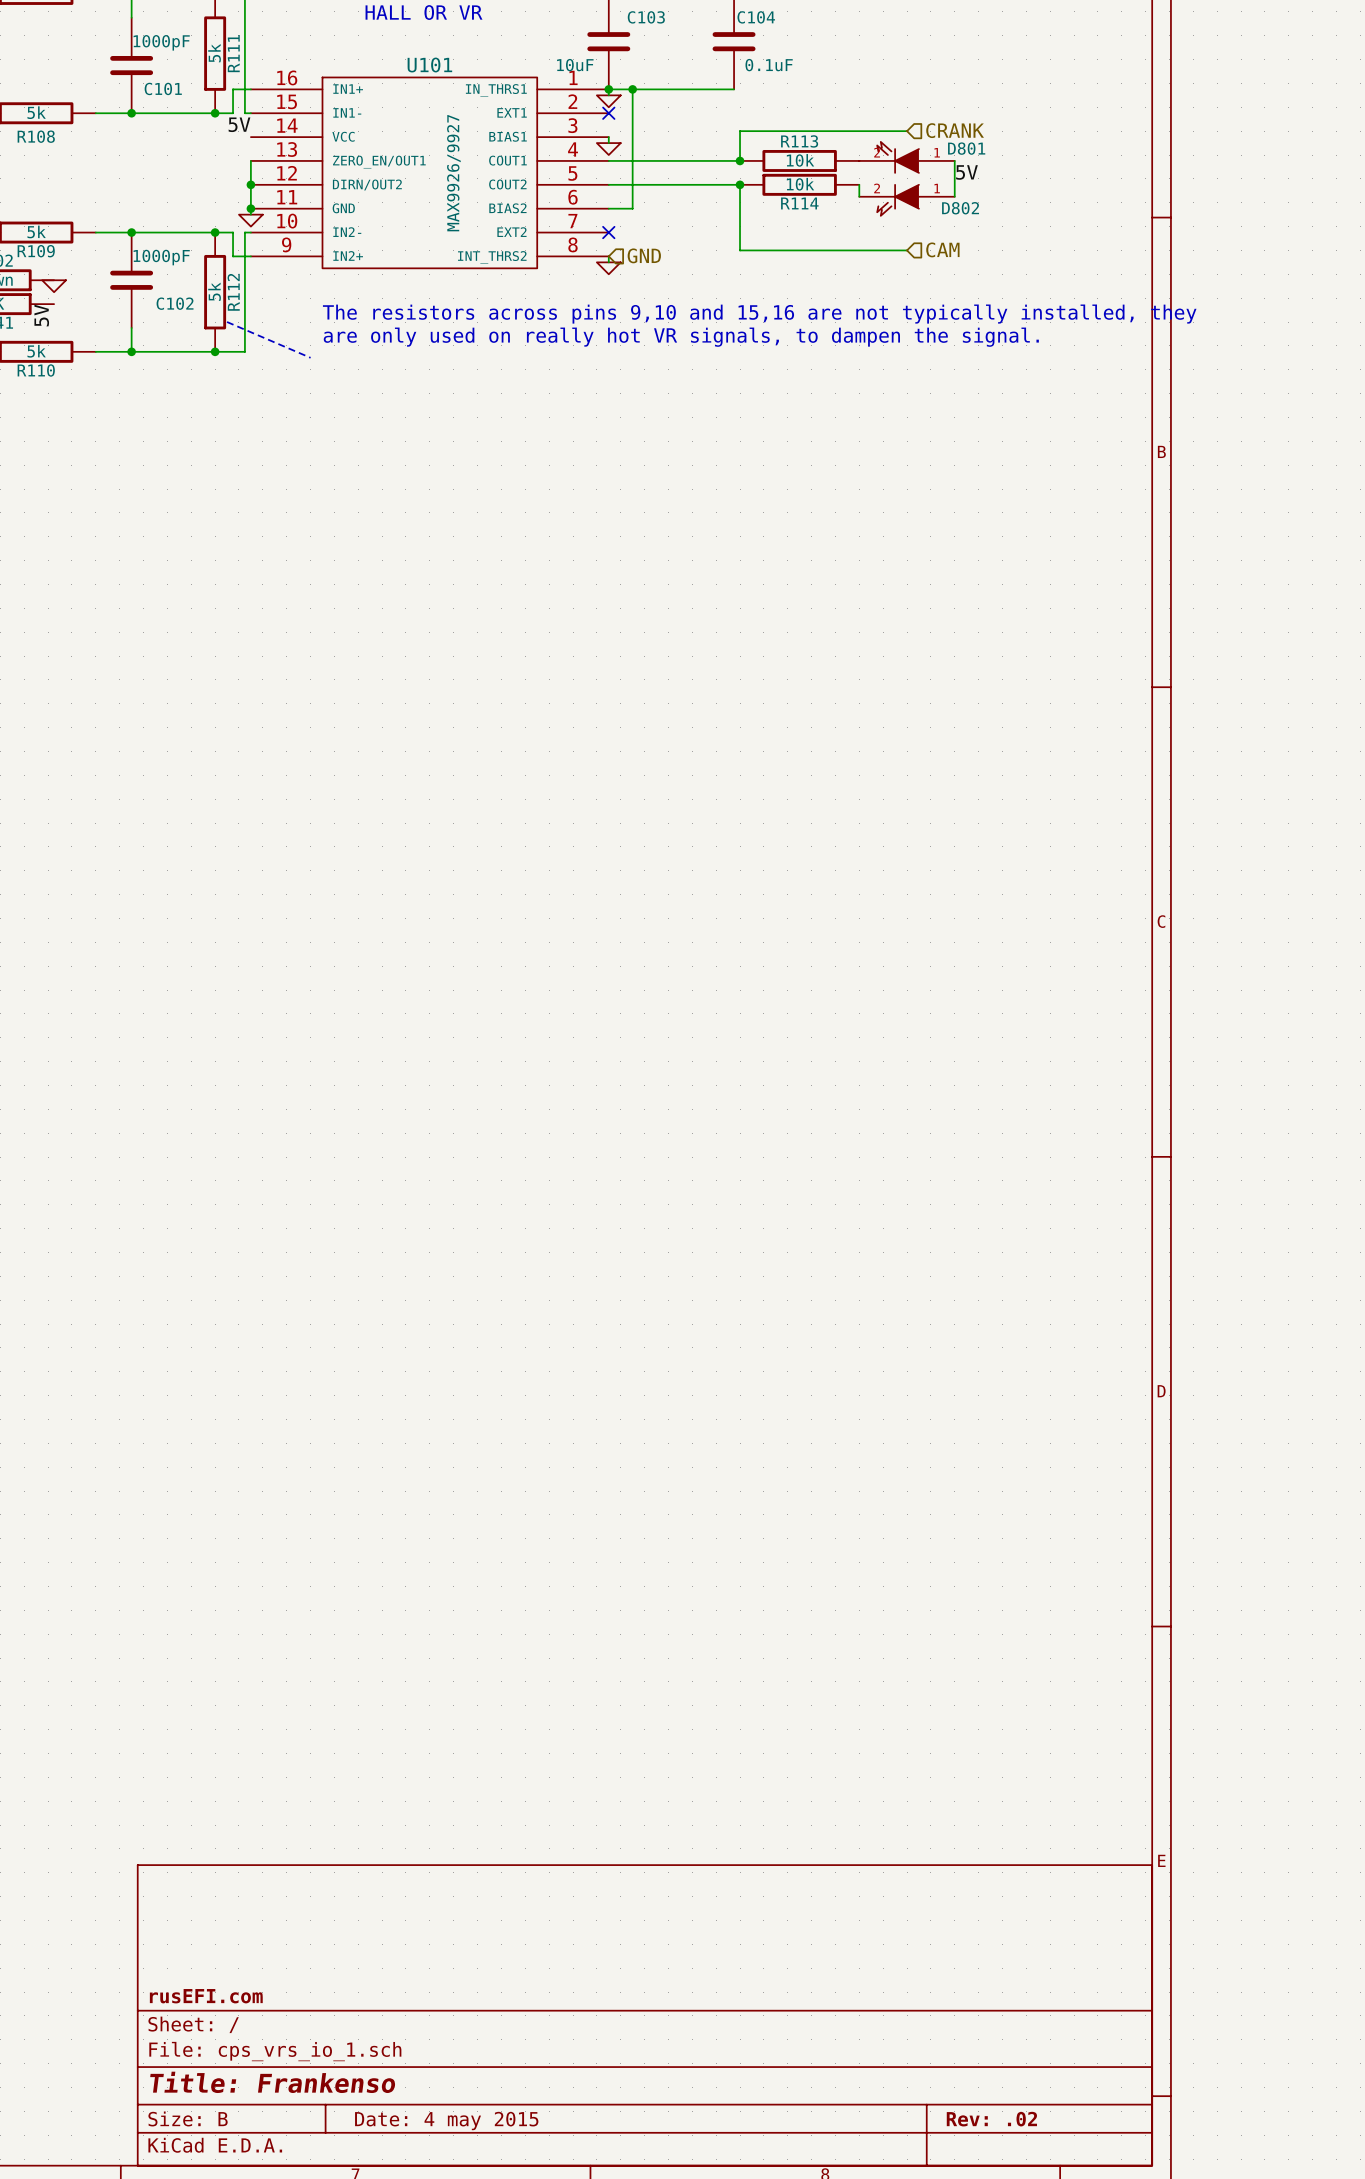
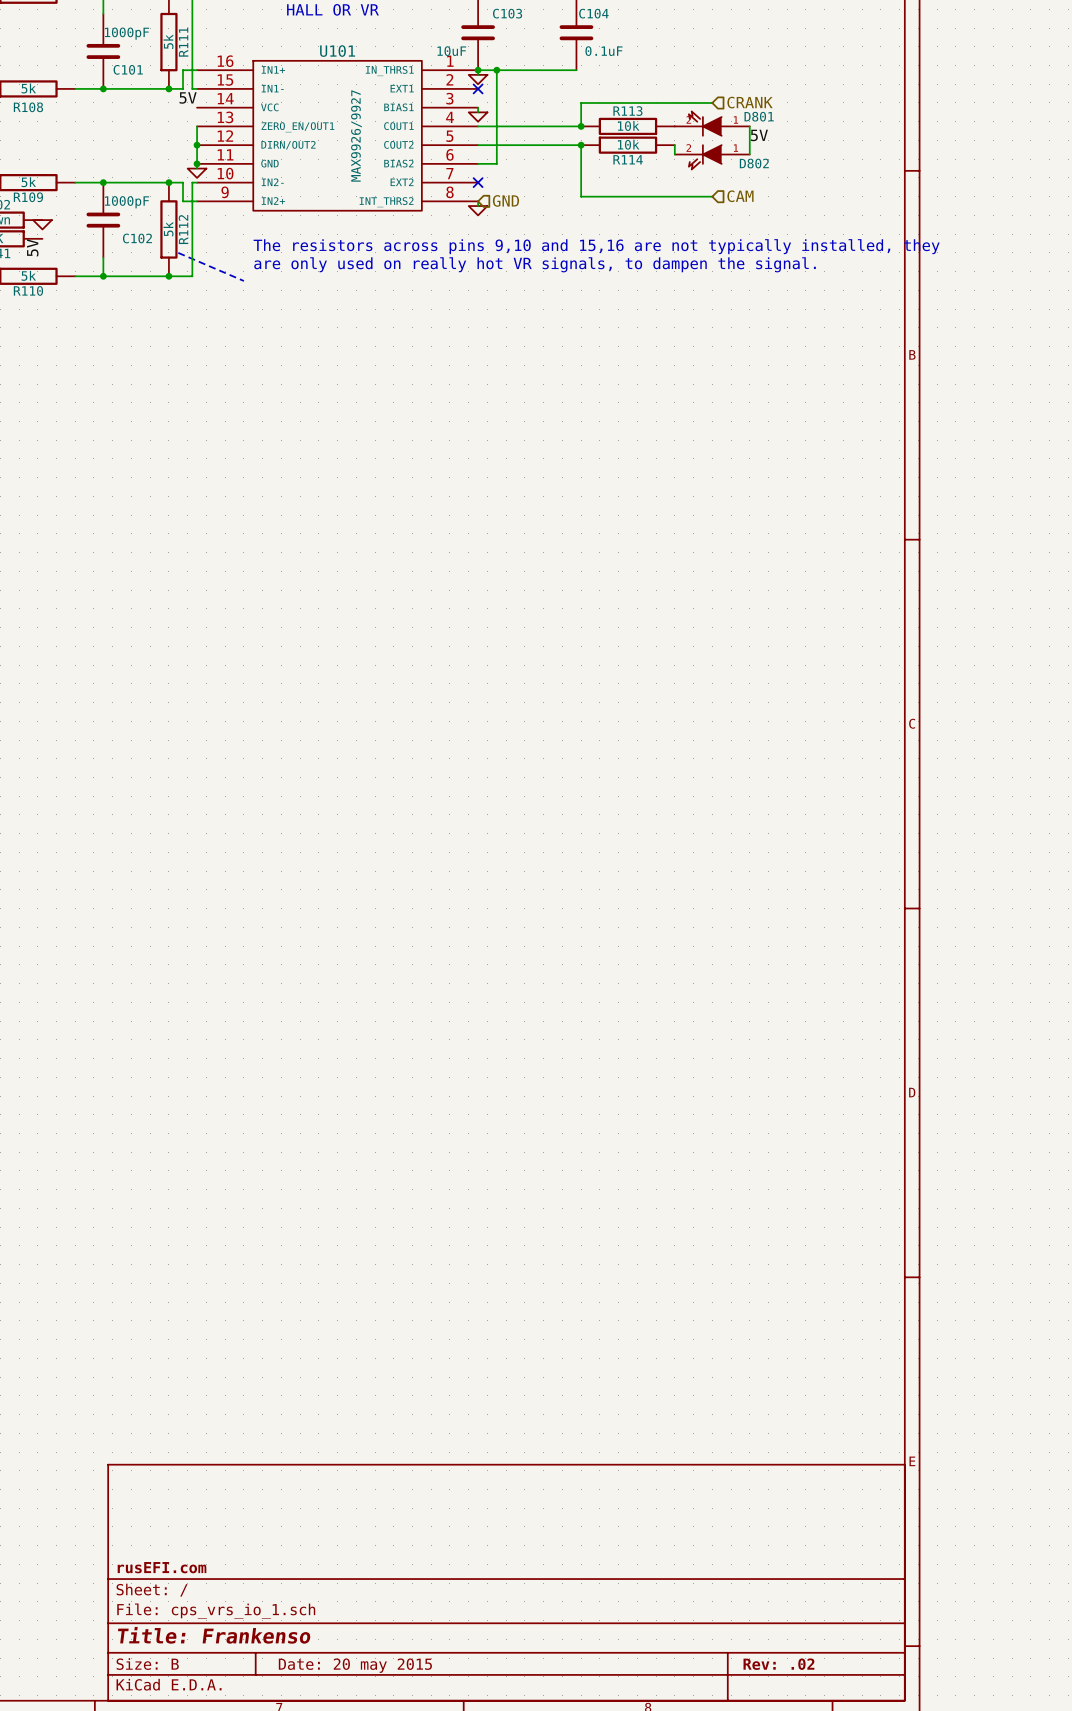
title block: Date: 4 may 2015 (446, 2121) -> Date: 20 may 2015 (355, 1665)

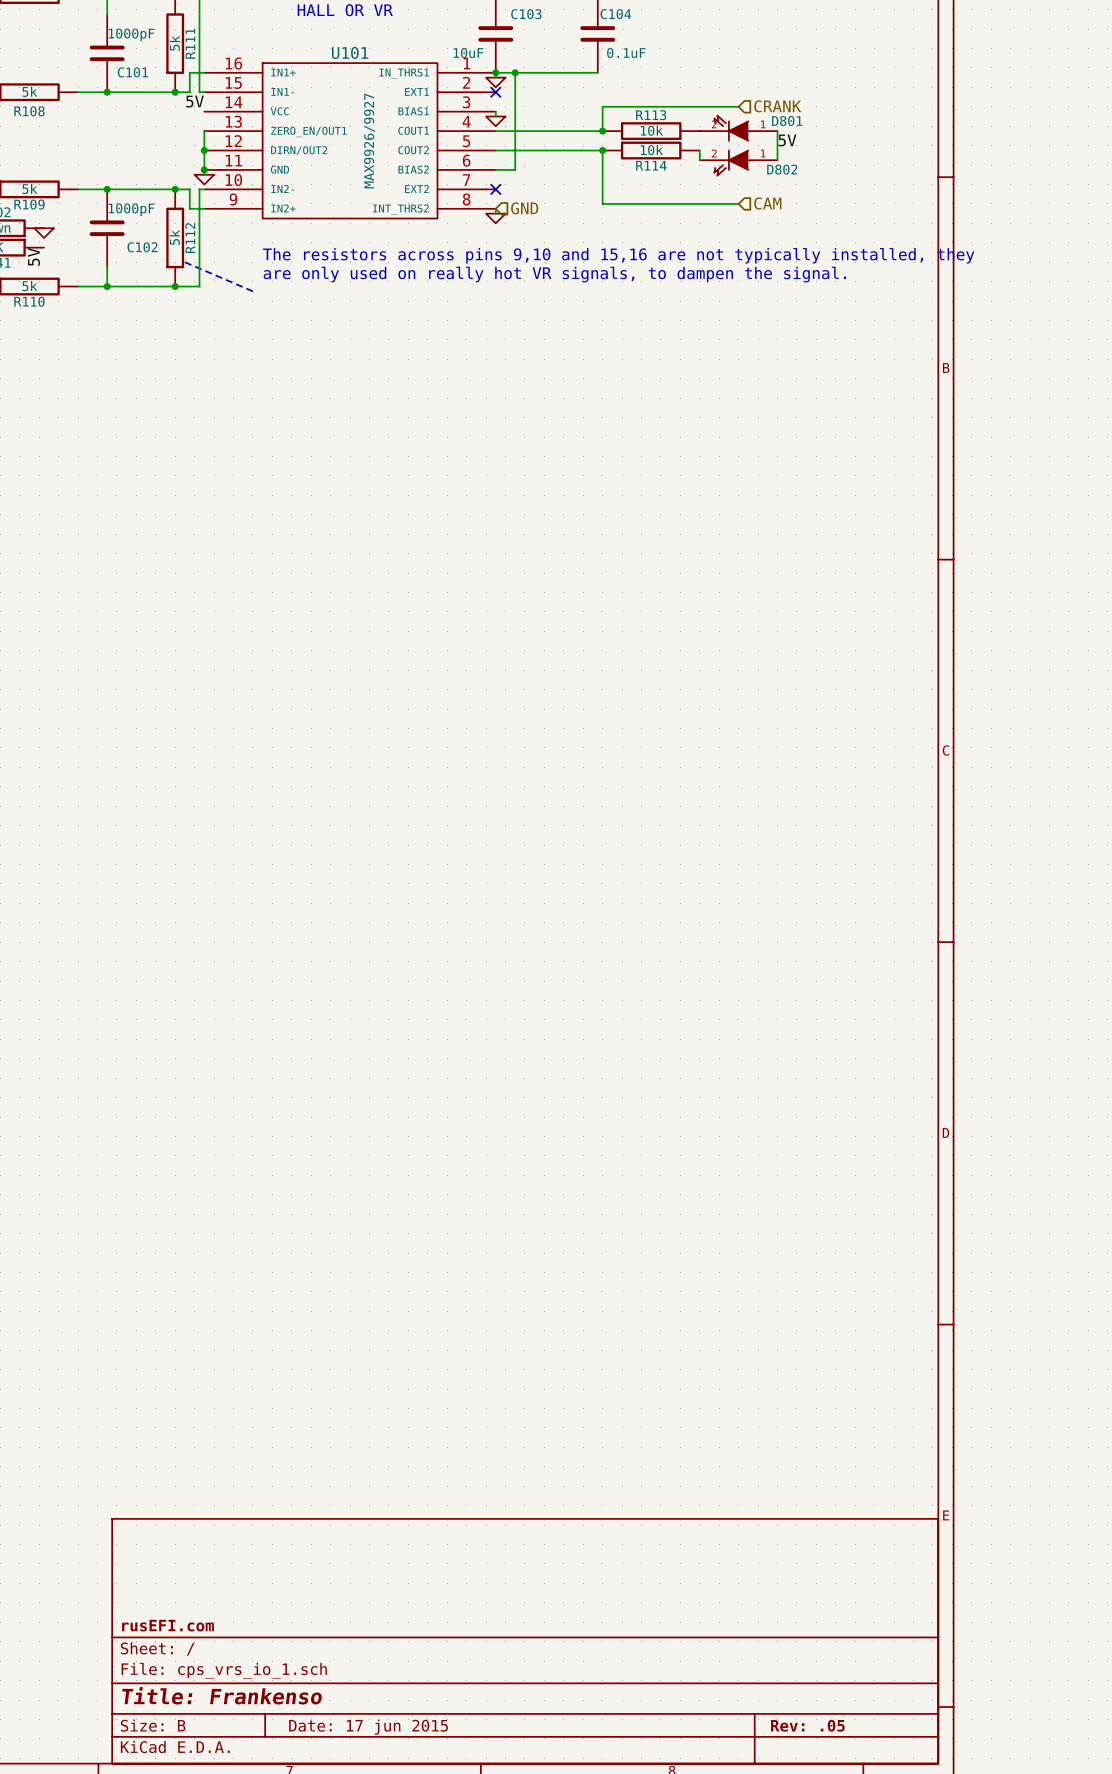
title block: Rev: .02 (778, 1664) -> Rev: .05 (807, 1725)
title block: Date: 20 may 2015 (355, 1665) -> Date: 17 jun 2015 (368, 1727)

